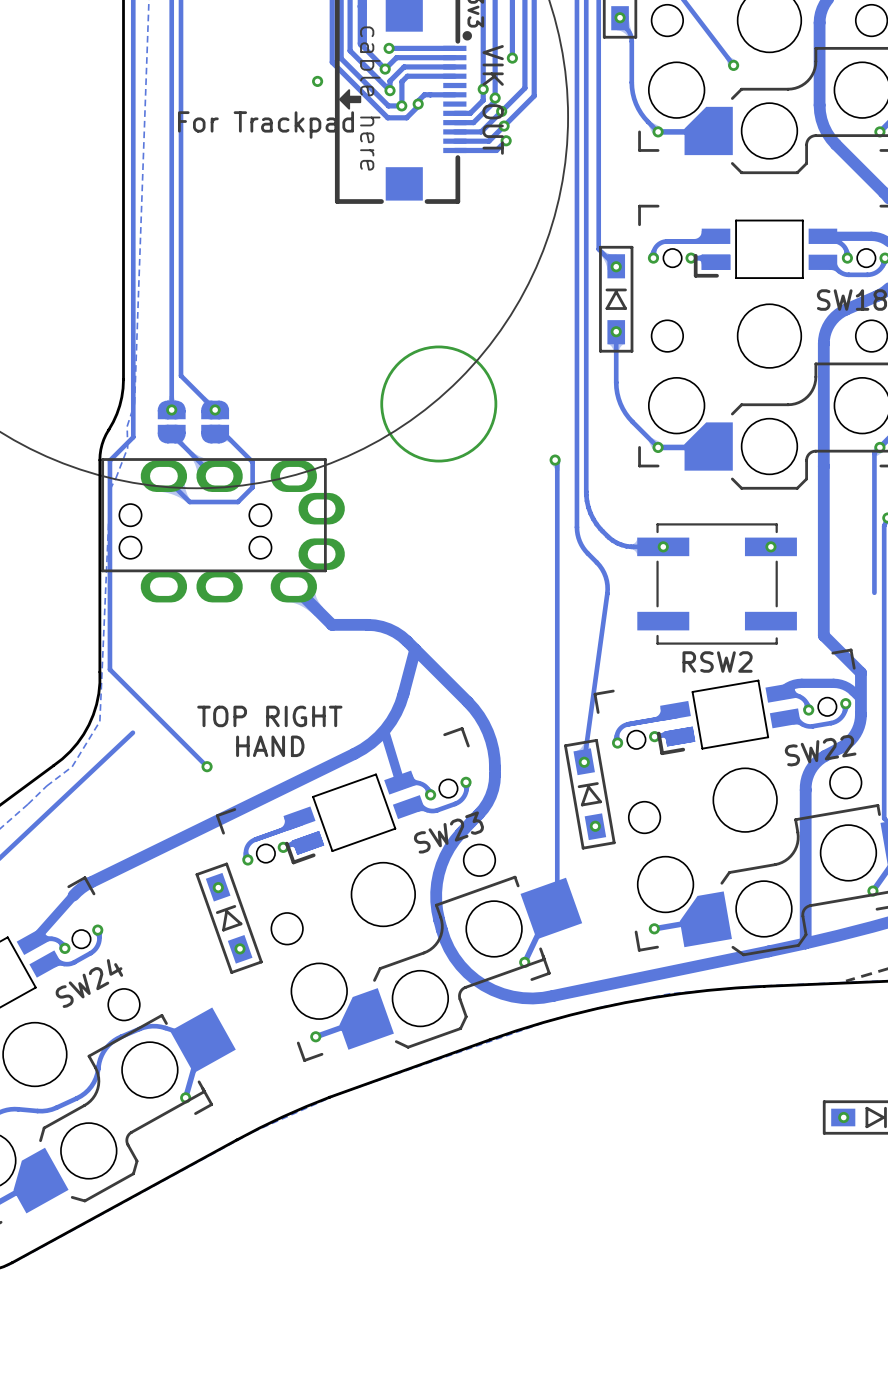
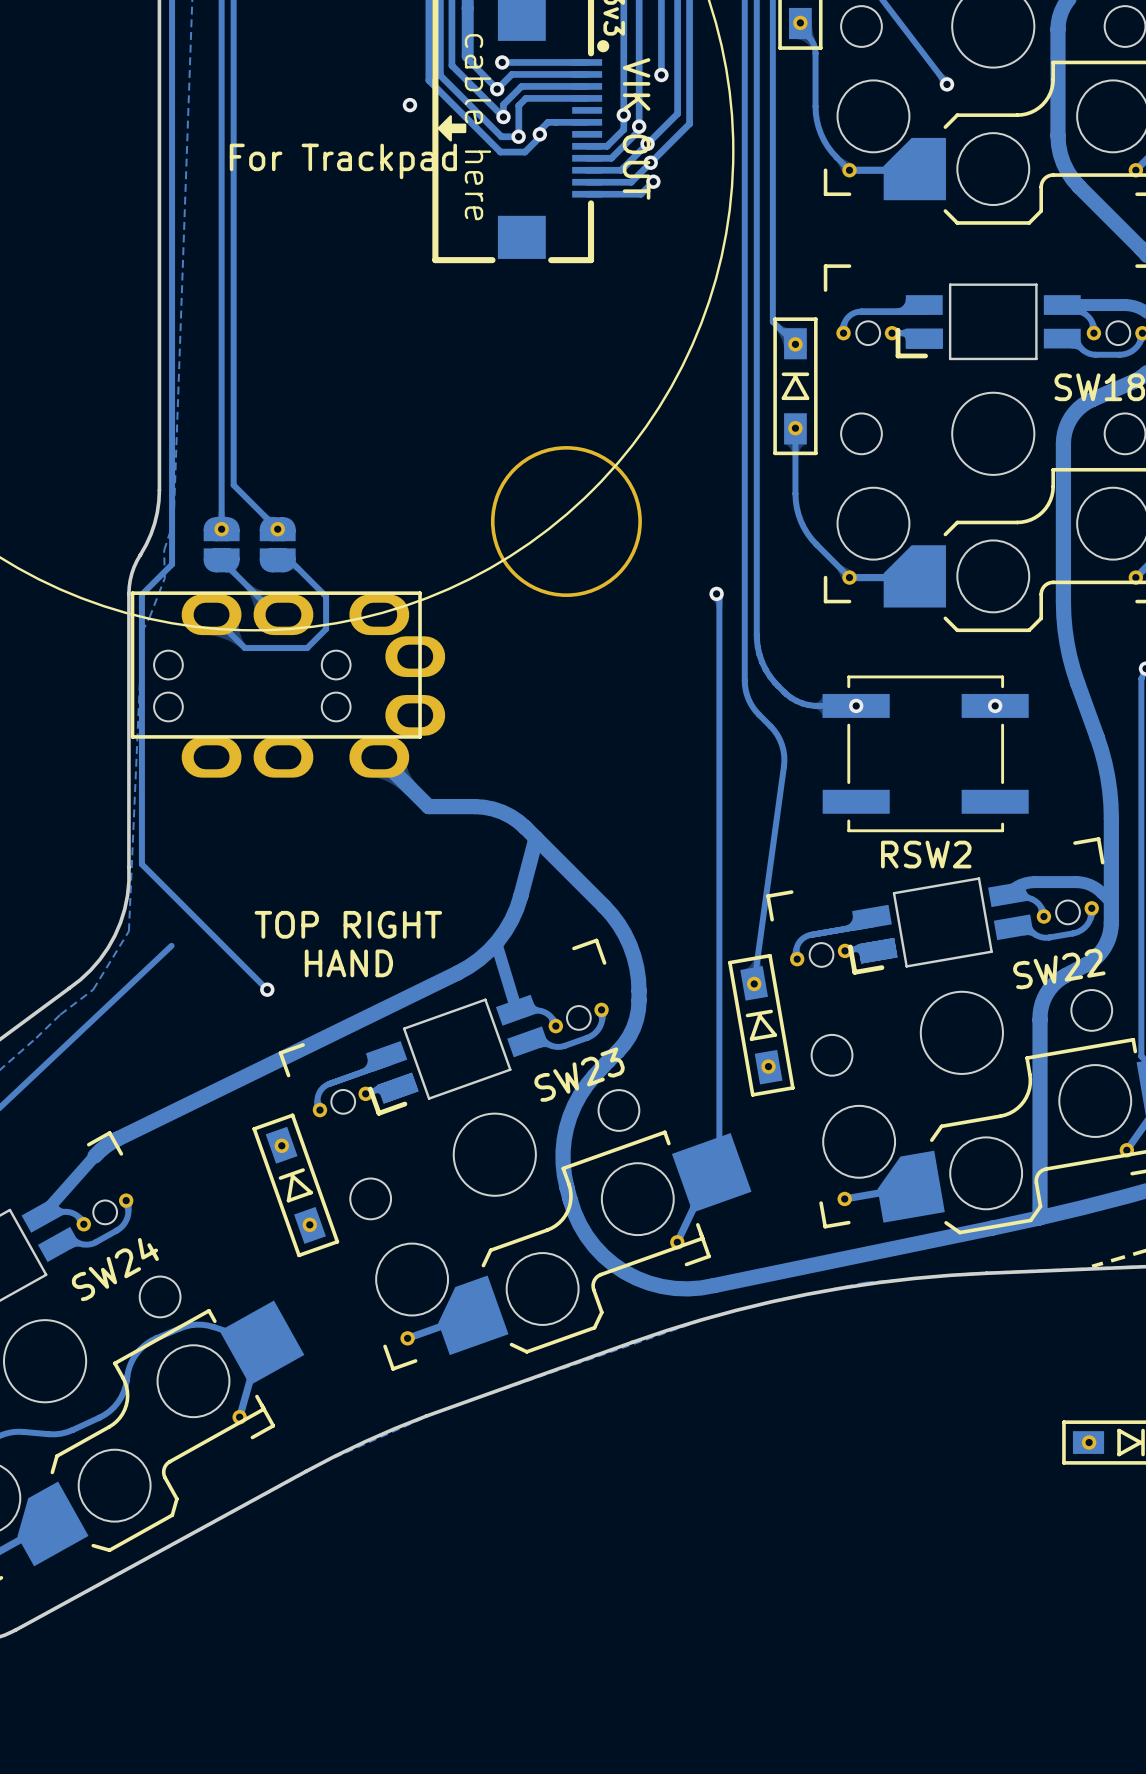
track: (879, 447) (874, 452) (874, 592) -> none
track: (823, 466) (823, 635) (860, 672) -> (1063, 601) (1065, 629) (1069, 656) (1101, 750) (1107, 777) (1110, 804) (1111, 868)

